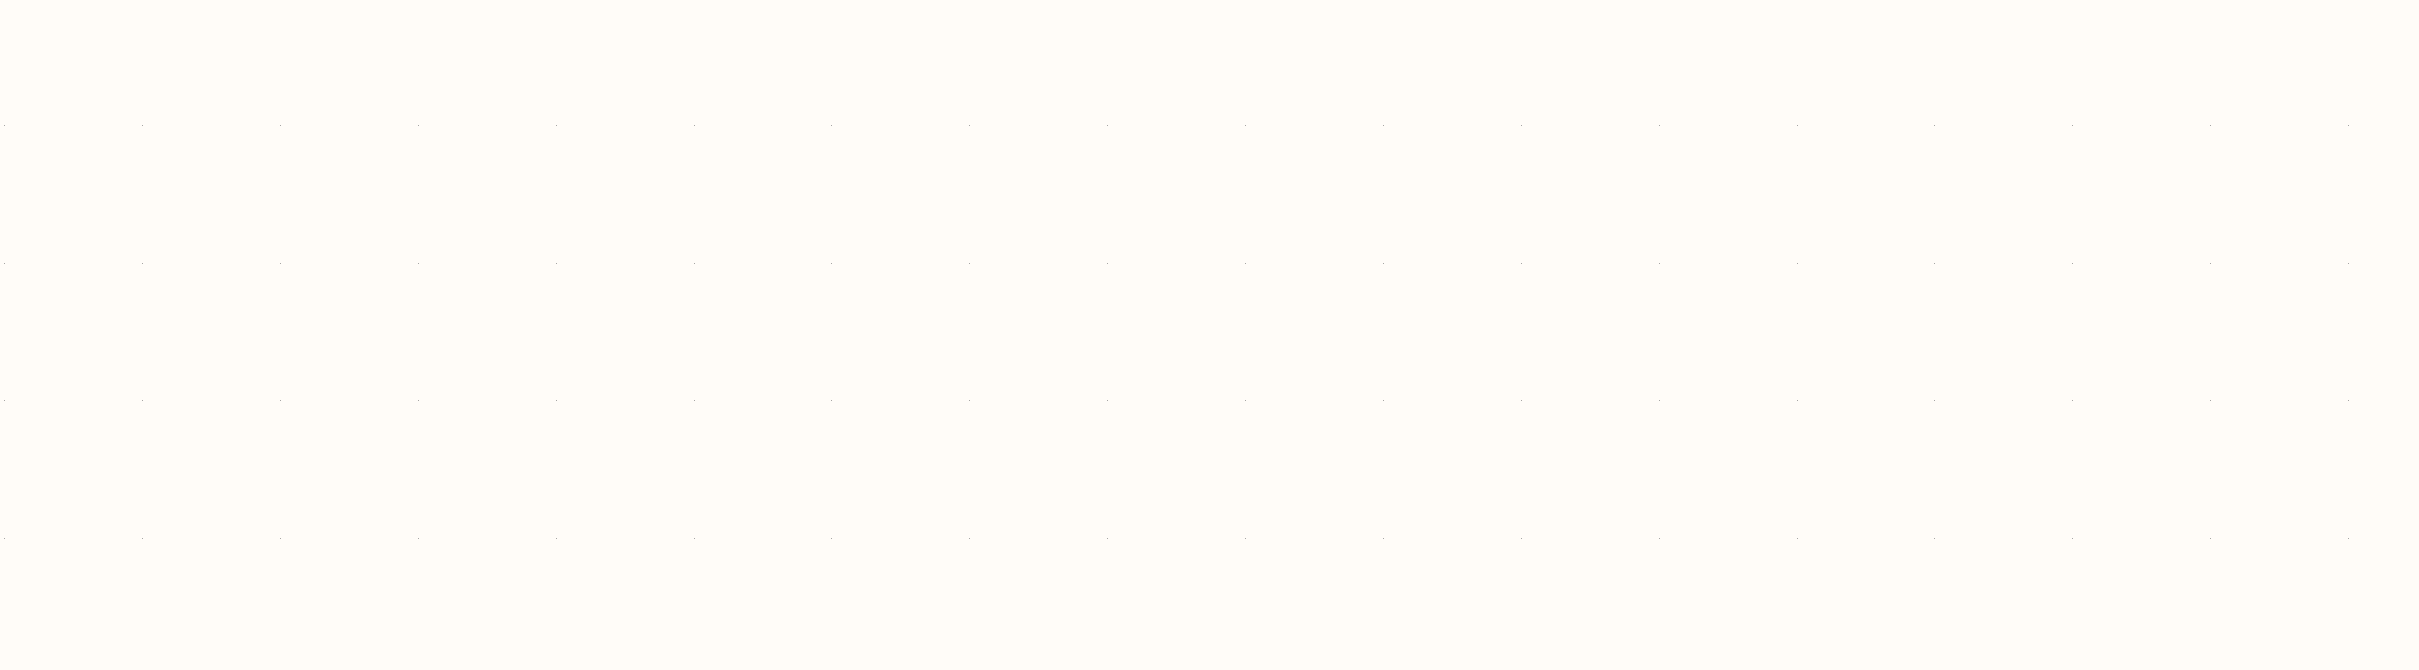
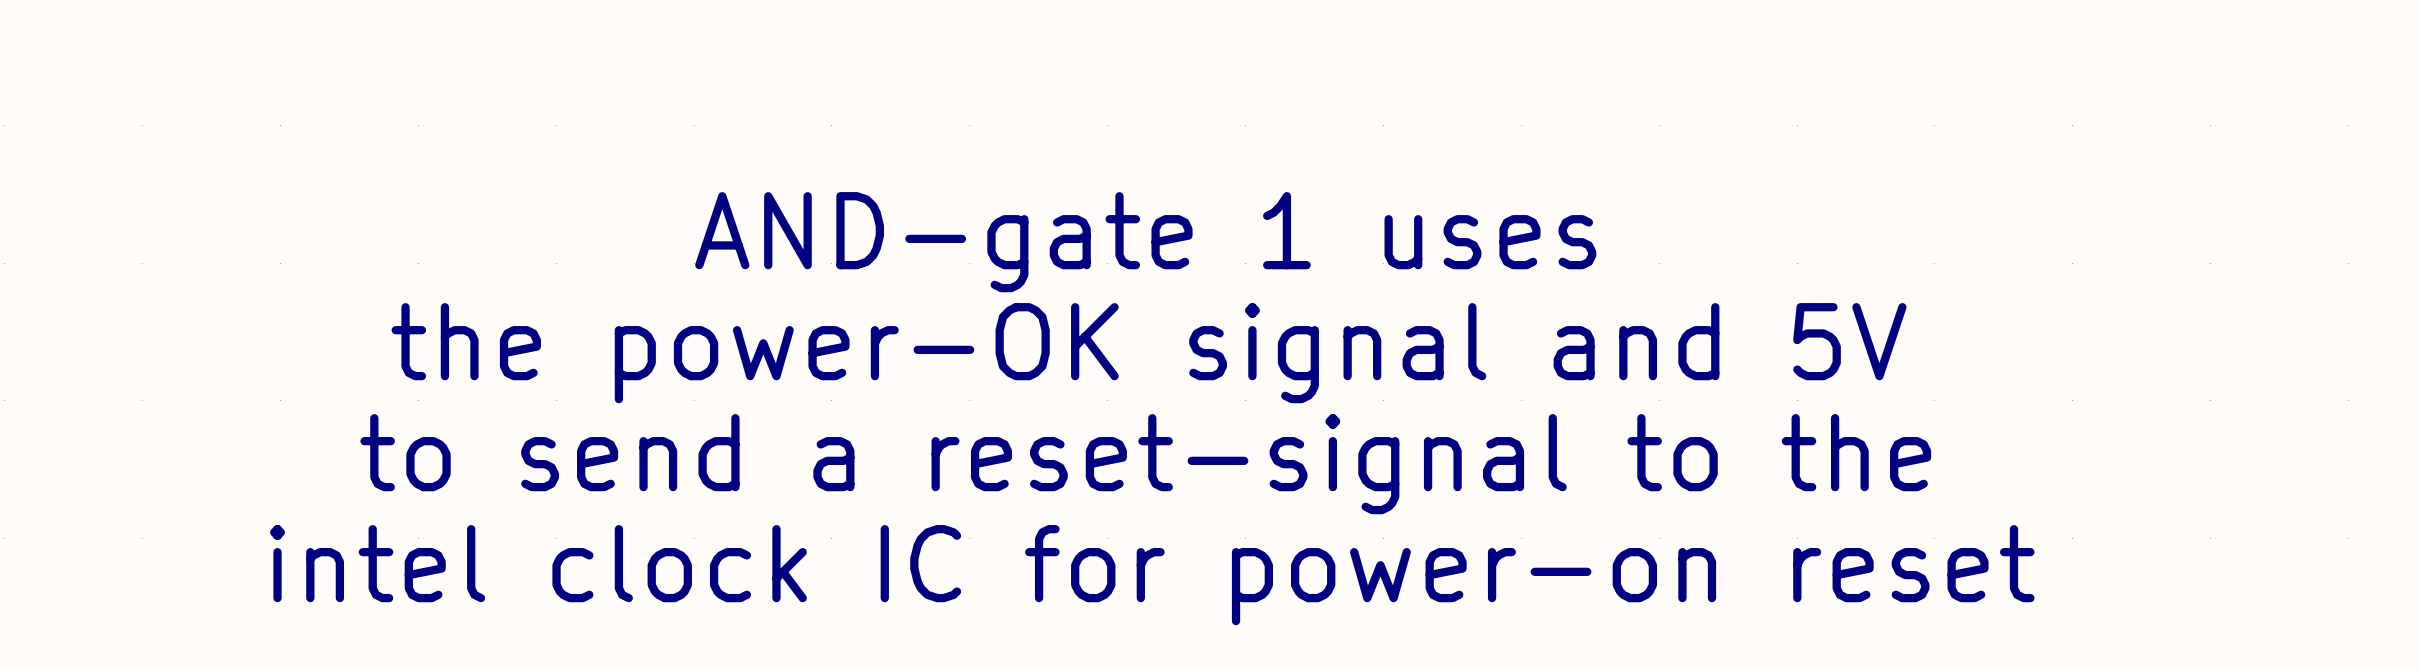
text: none -> AND-gate 1 uses (1145, 242)
text: none -> the power-OK signal and 5V (1149, 353)
text: none -> to send a reset-signal to the (1145, 464)
text: none -> intel clock IC for power-on reset (1152, 575)

